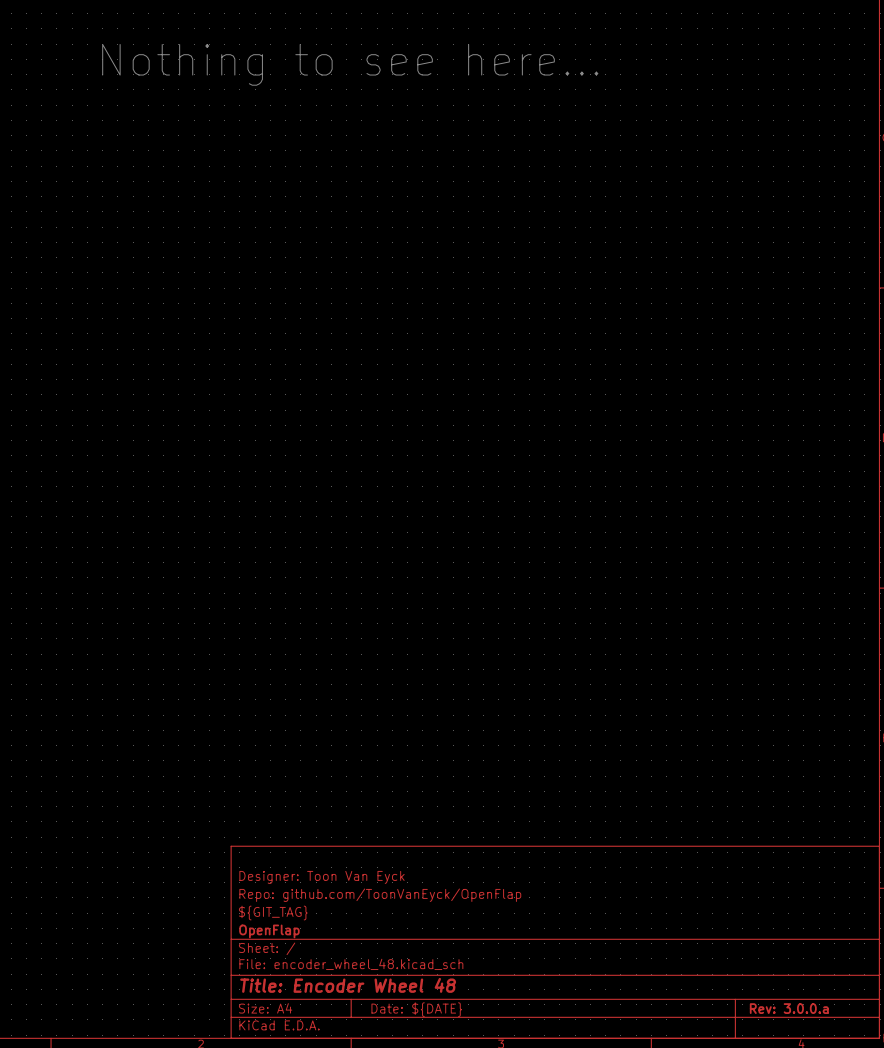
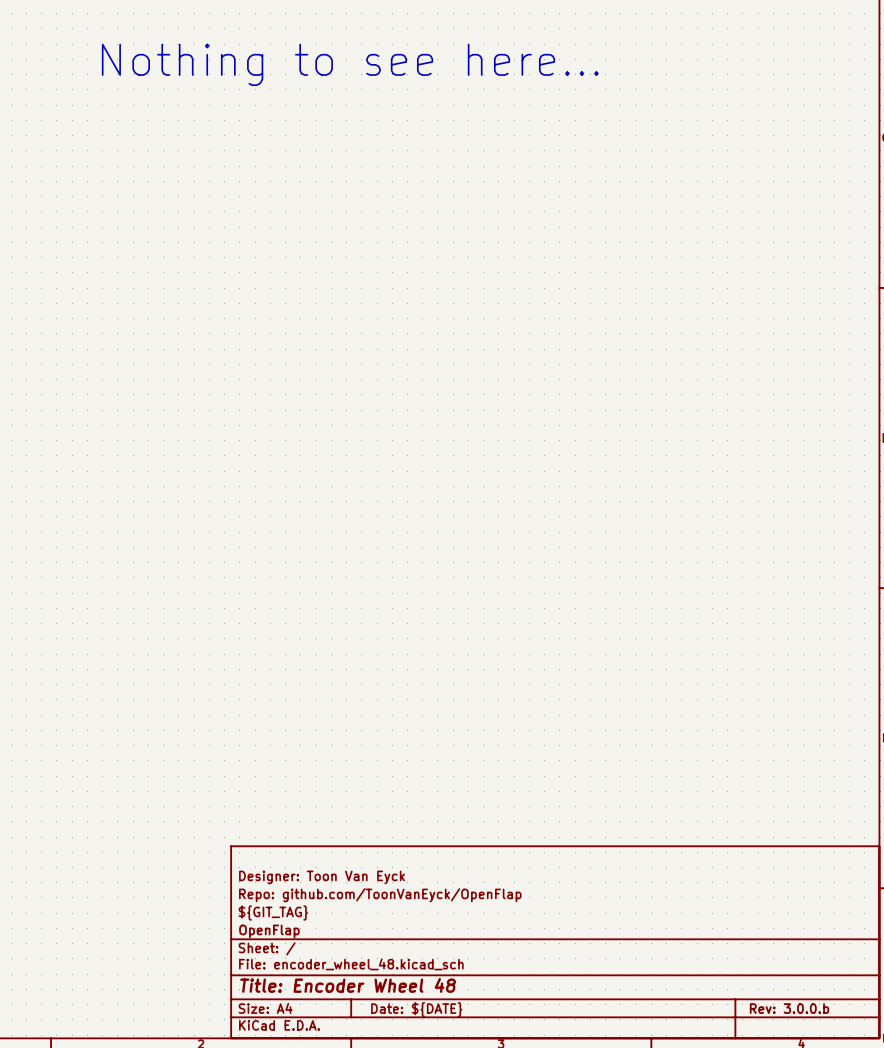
title block: Rev: 3.0.0.a (789, 1008) -> Rev: 3.0.0.b (789, 1008)

